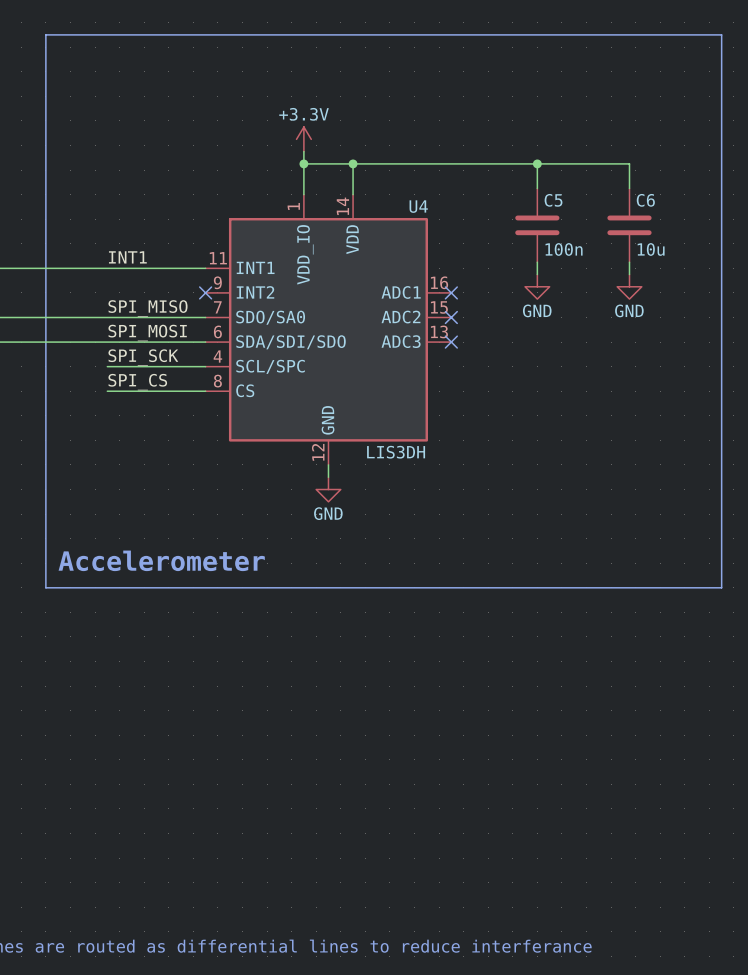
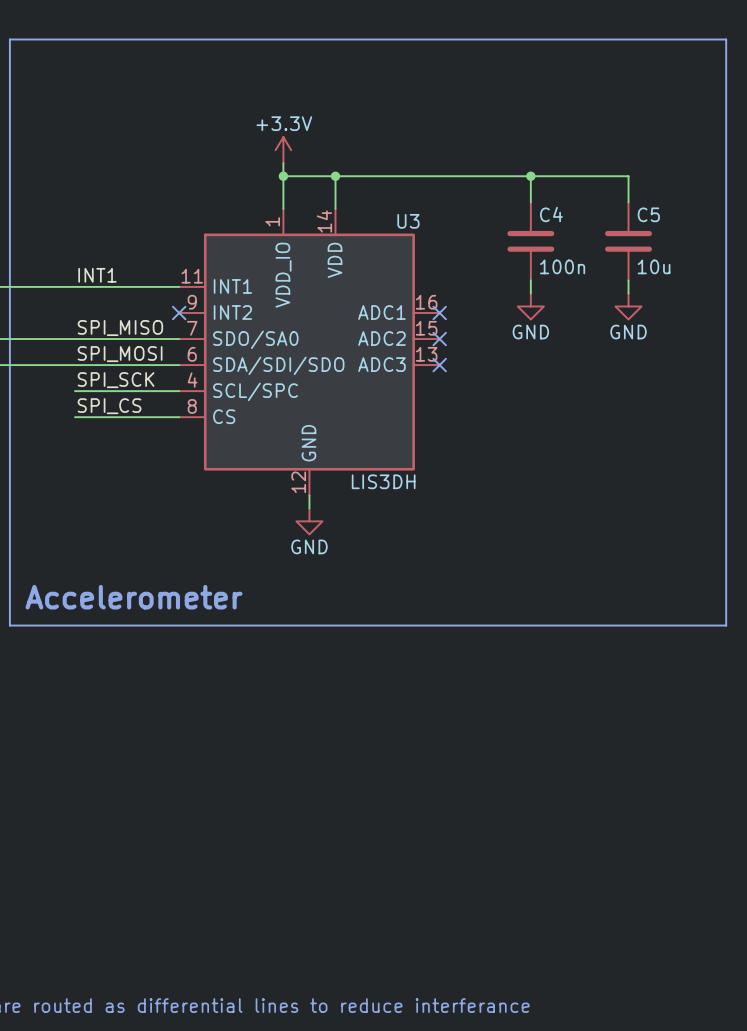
C5 name: C5 (553, 200) -> C4 (551, 214)
C6 name: C6 (645, 200) -> C5 (648, 214)
U4 name: U4 (418, 206) -> U3 (408, 221)

